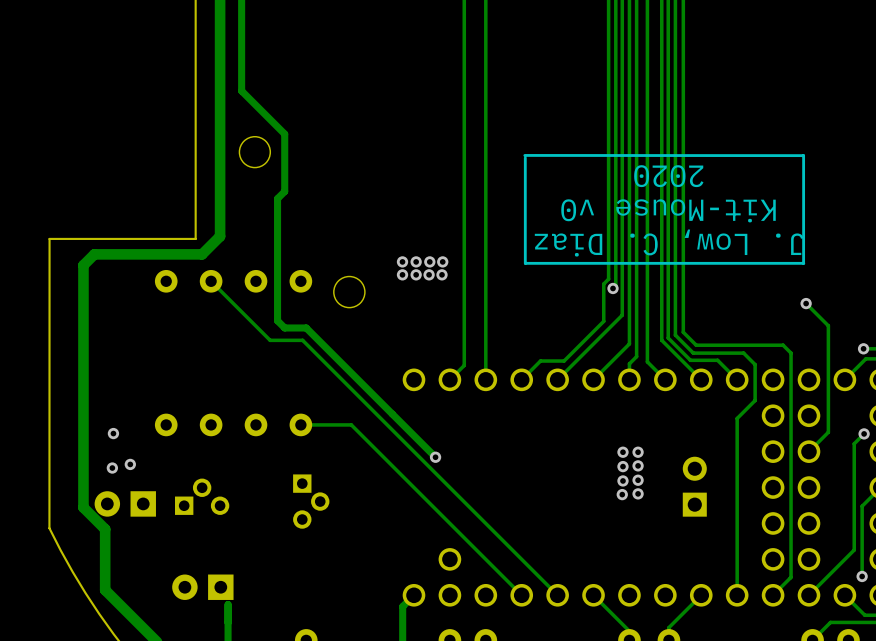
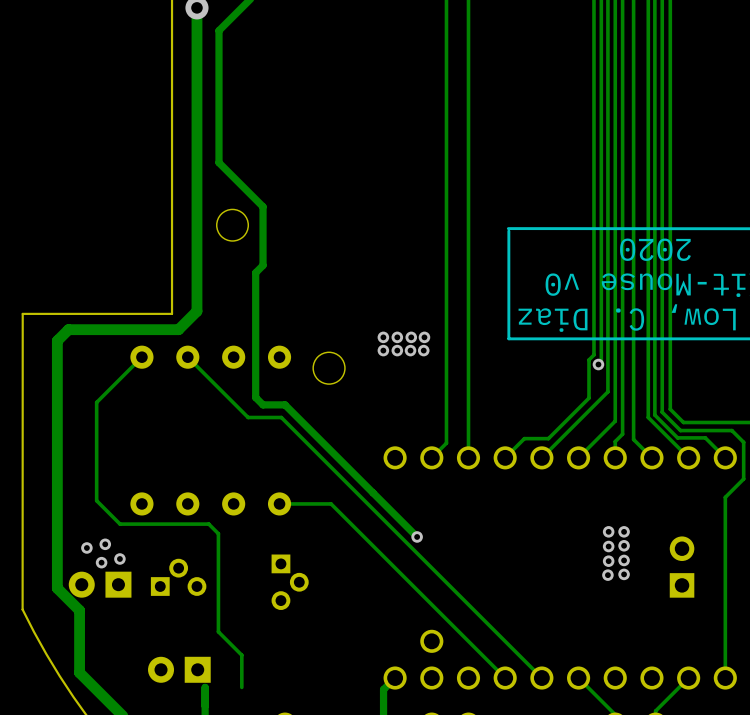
track: none -> (141, 357) (96, 402) (96, 500) (120, 524) (208, 524) (218, 533) (218, 631) (241, 655) (241, 687)
via: (113, 433) -> none
via: none -> (119, 558)
via: none -> (101, 562)

